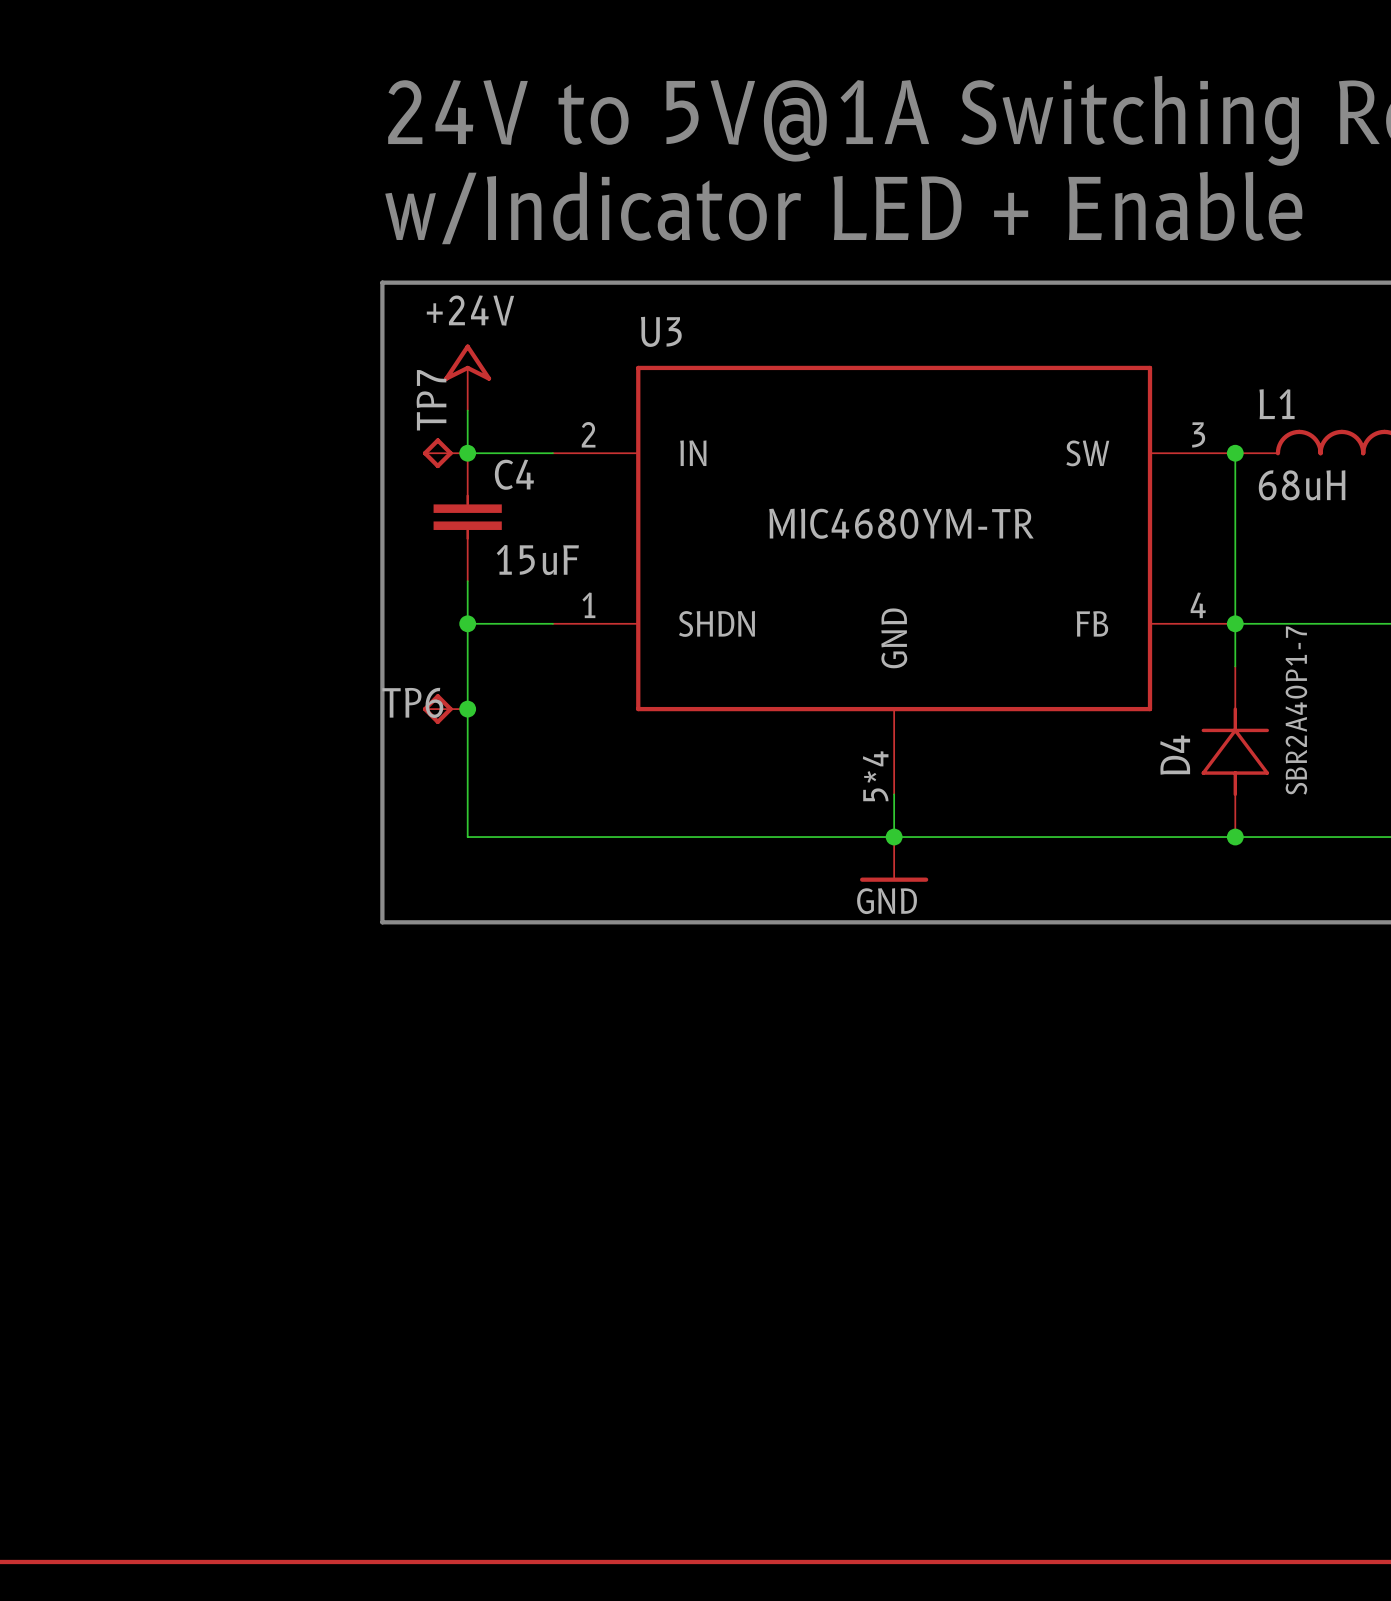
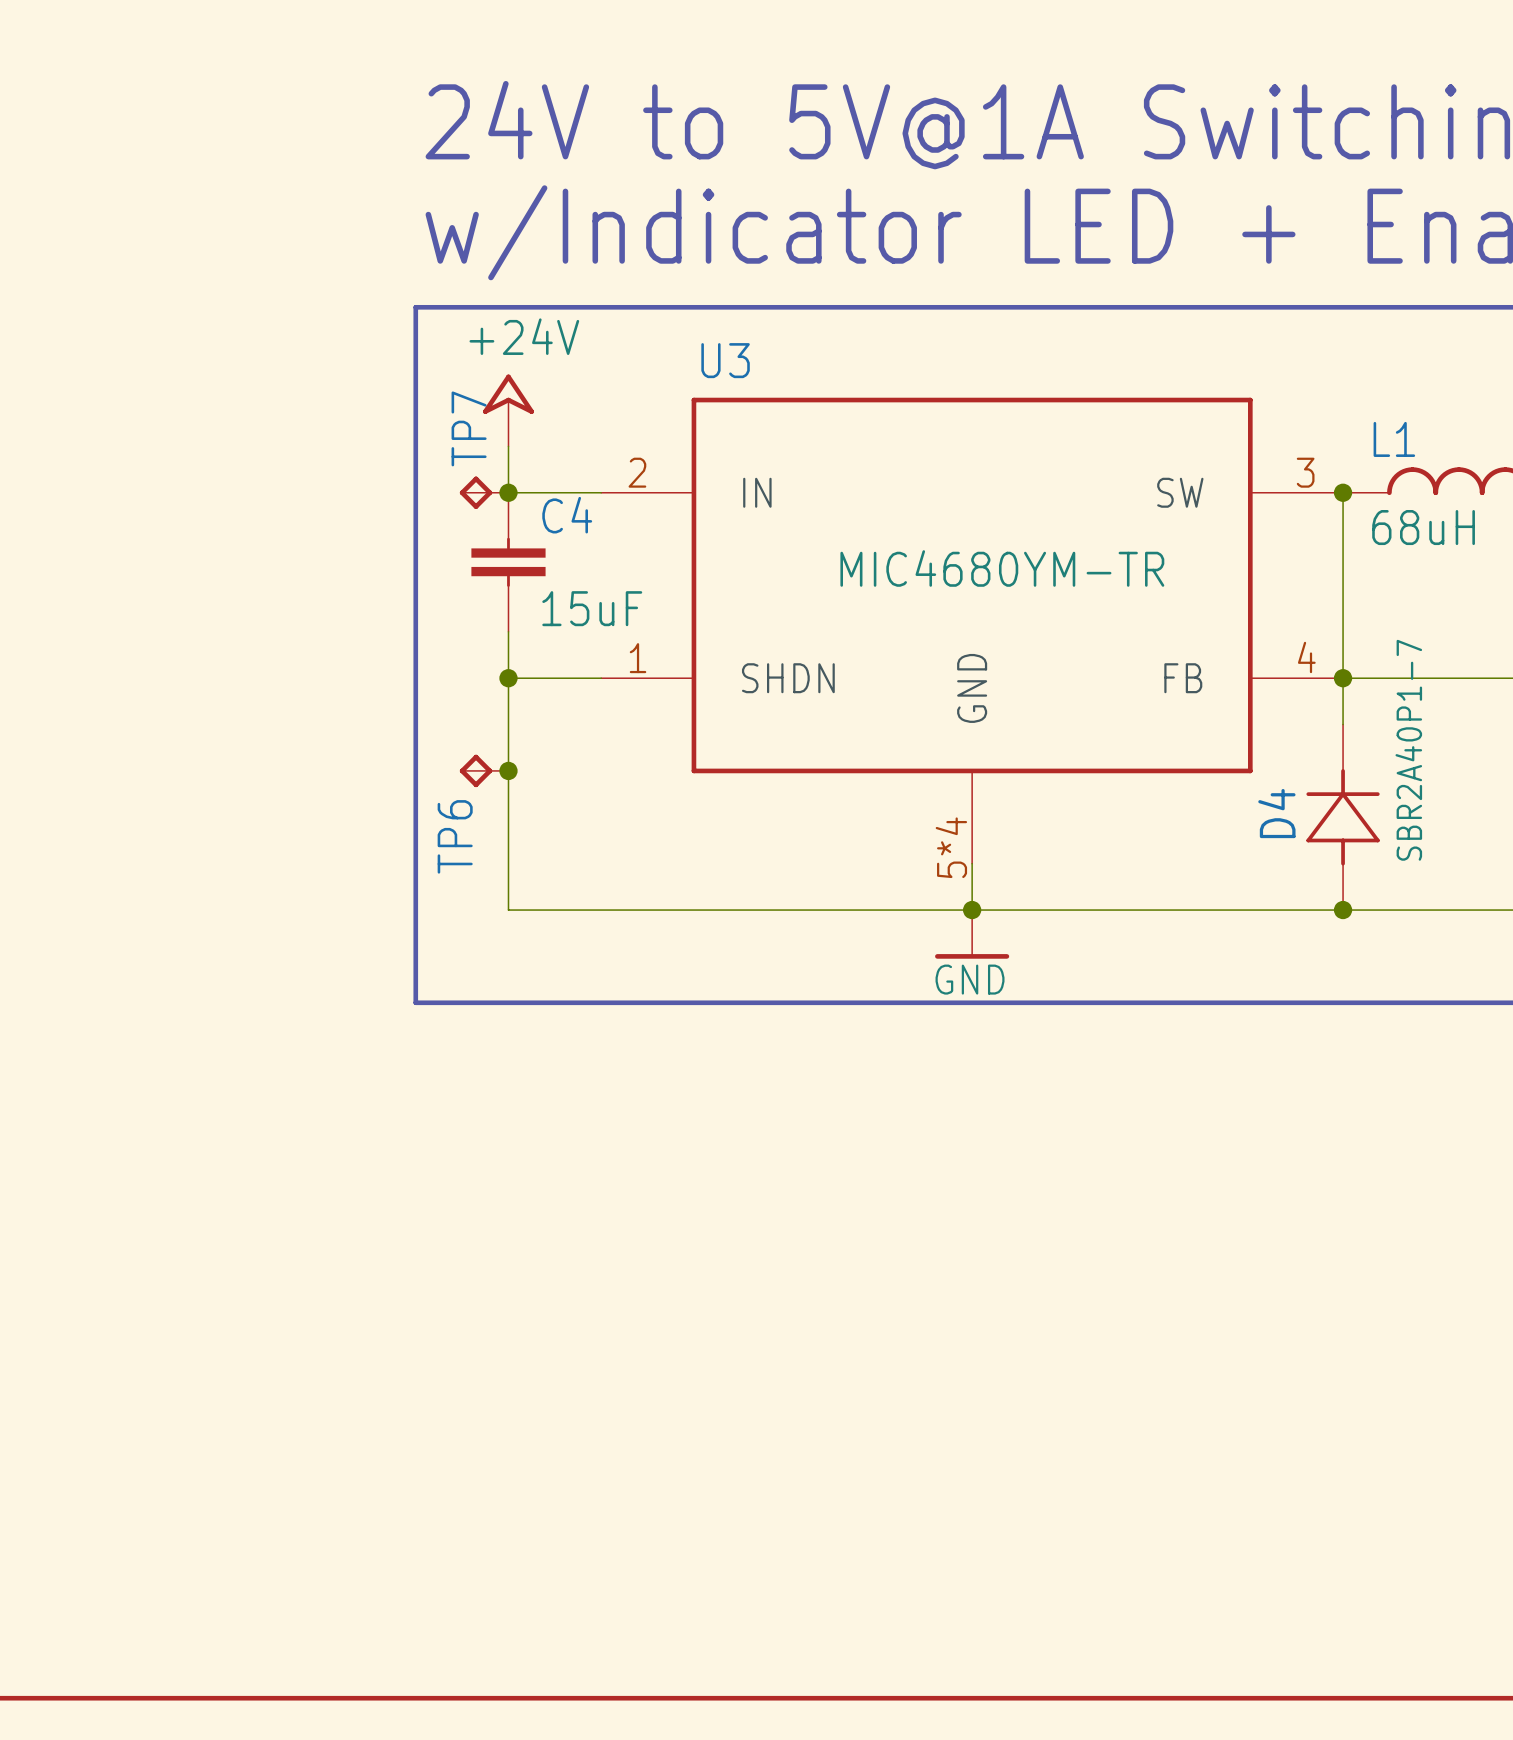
TP6 name rotation: 0° (412, 702) -> 90° counterclockwise (455, 836)

